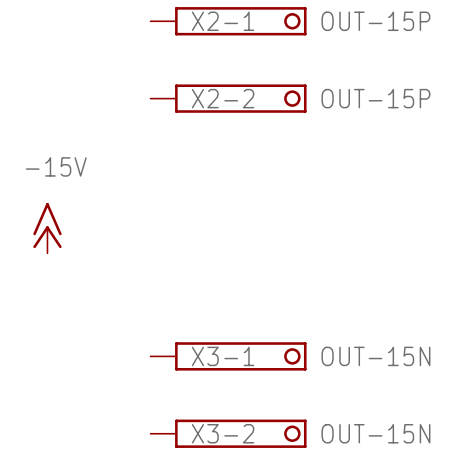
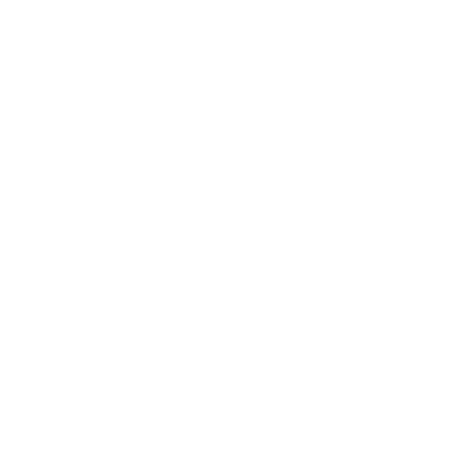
X2-1: OUT-15P (228, 21) -> none
X2-2: OUT-15P (228, 98) -> none
power symbol: -15V (47, 228) -> none
X3-1: OUT-15N (228, 356) -> none
X3-2: OUT-15N (228, 433) -> none

